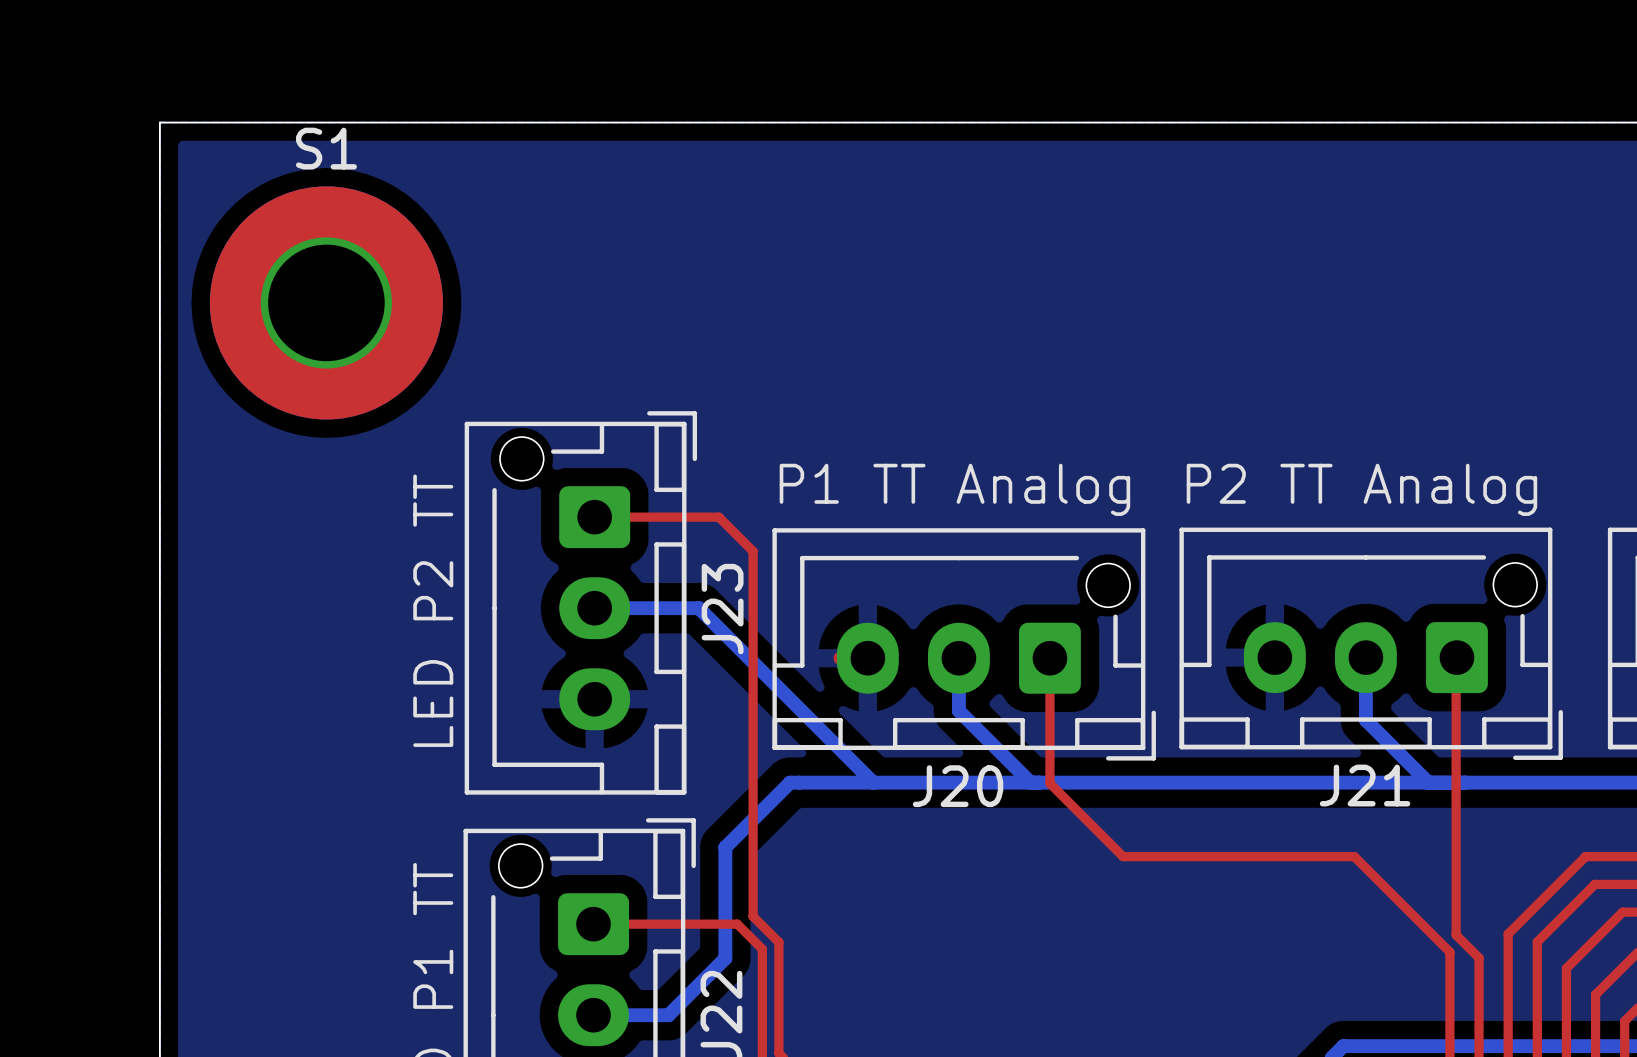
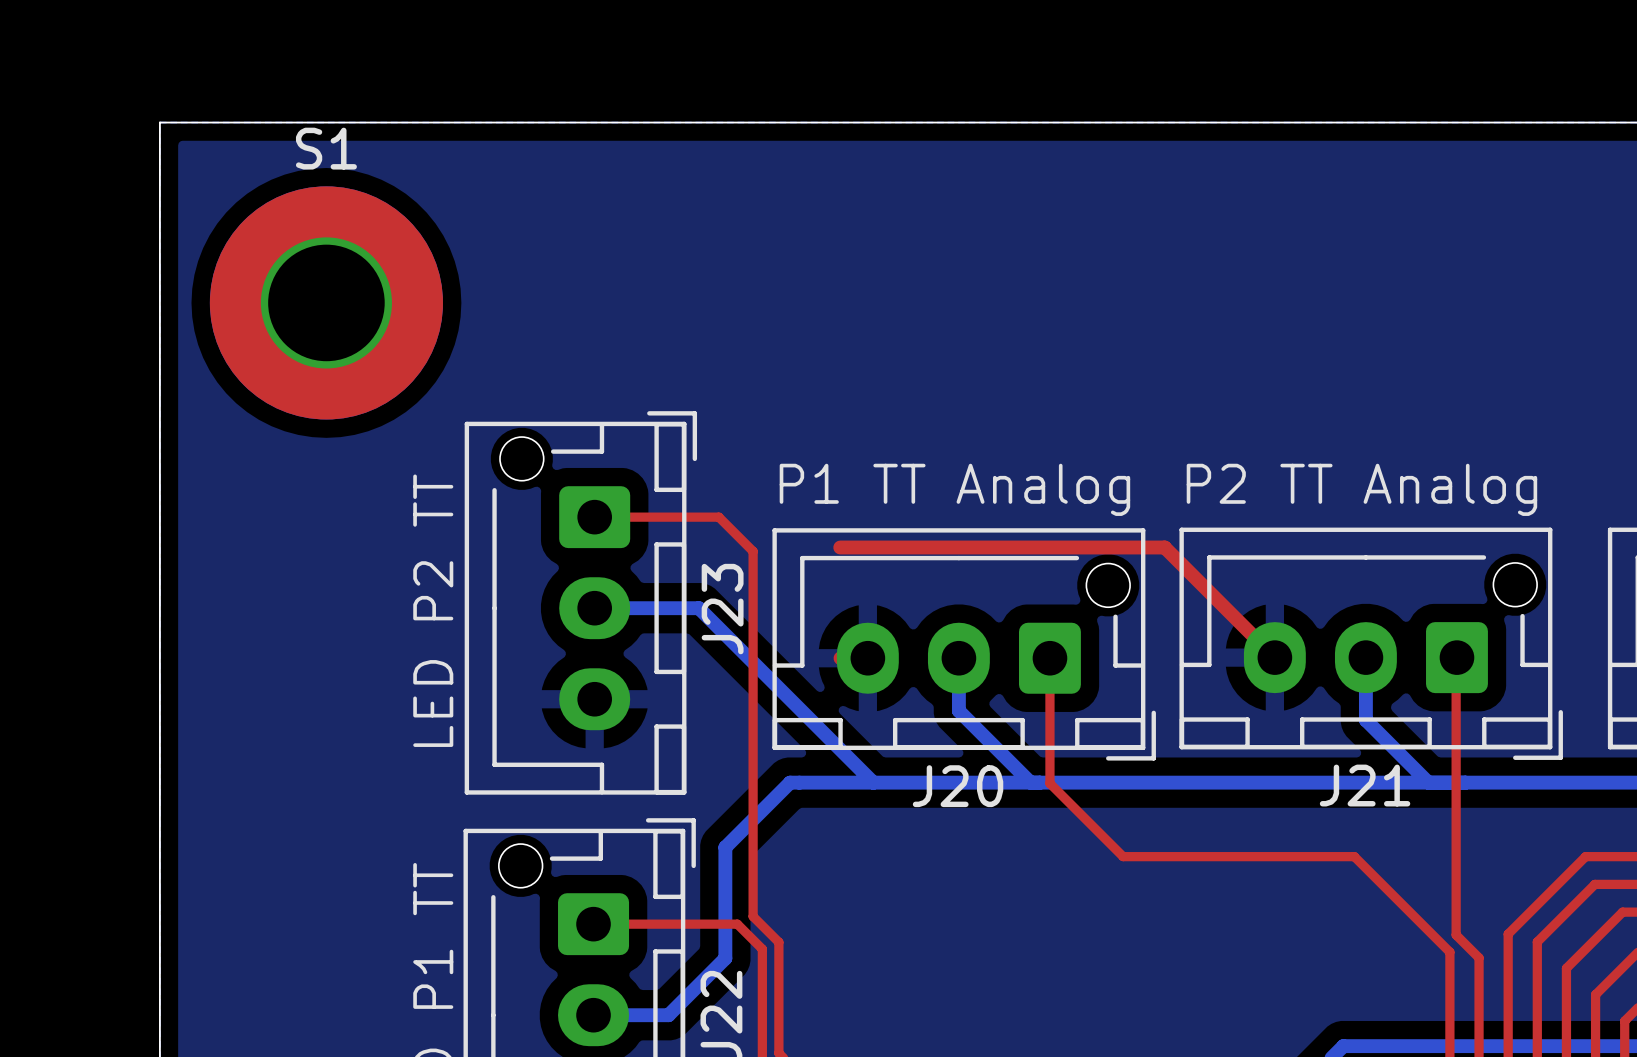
top track: none -> (840, 547) (1164, 547) (1274, 657)

